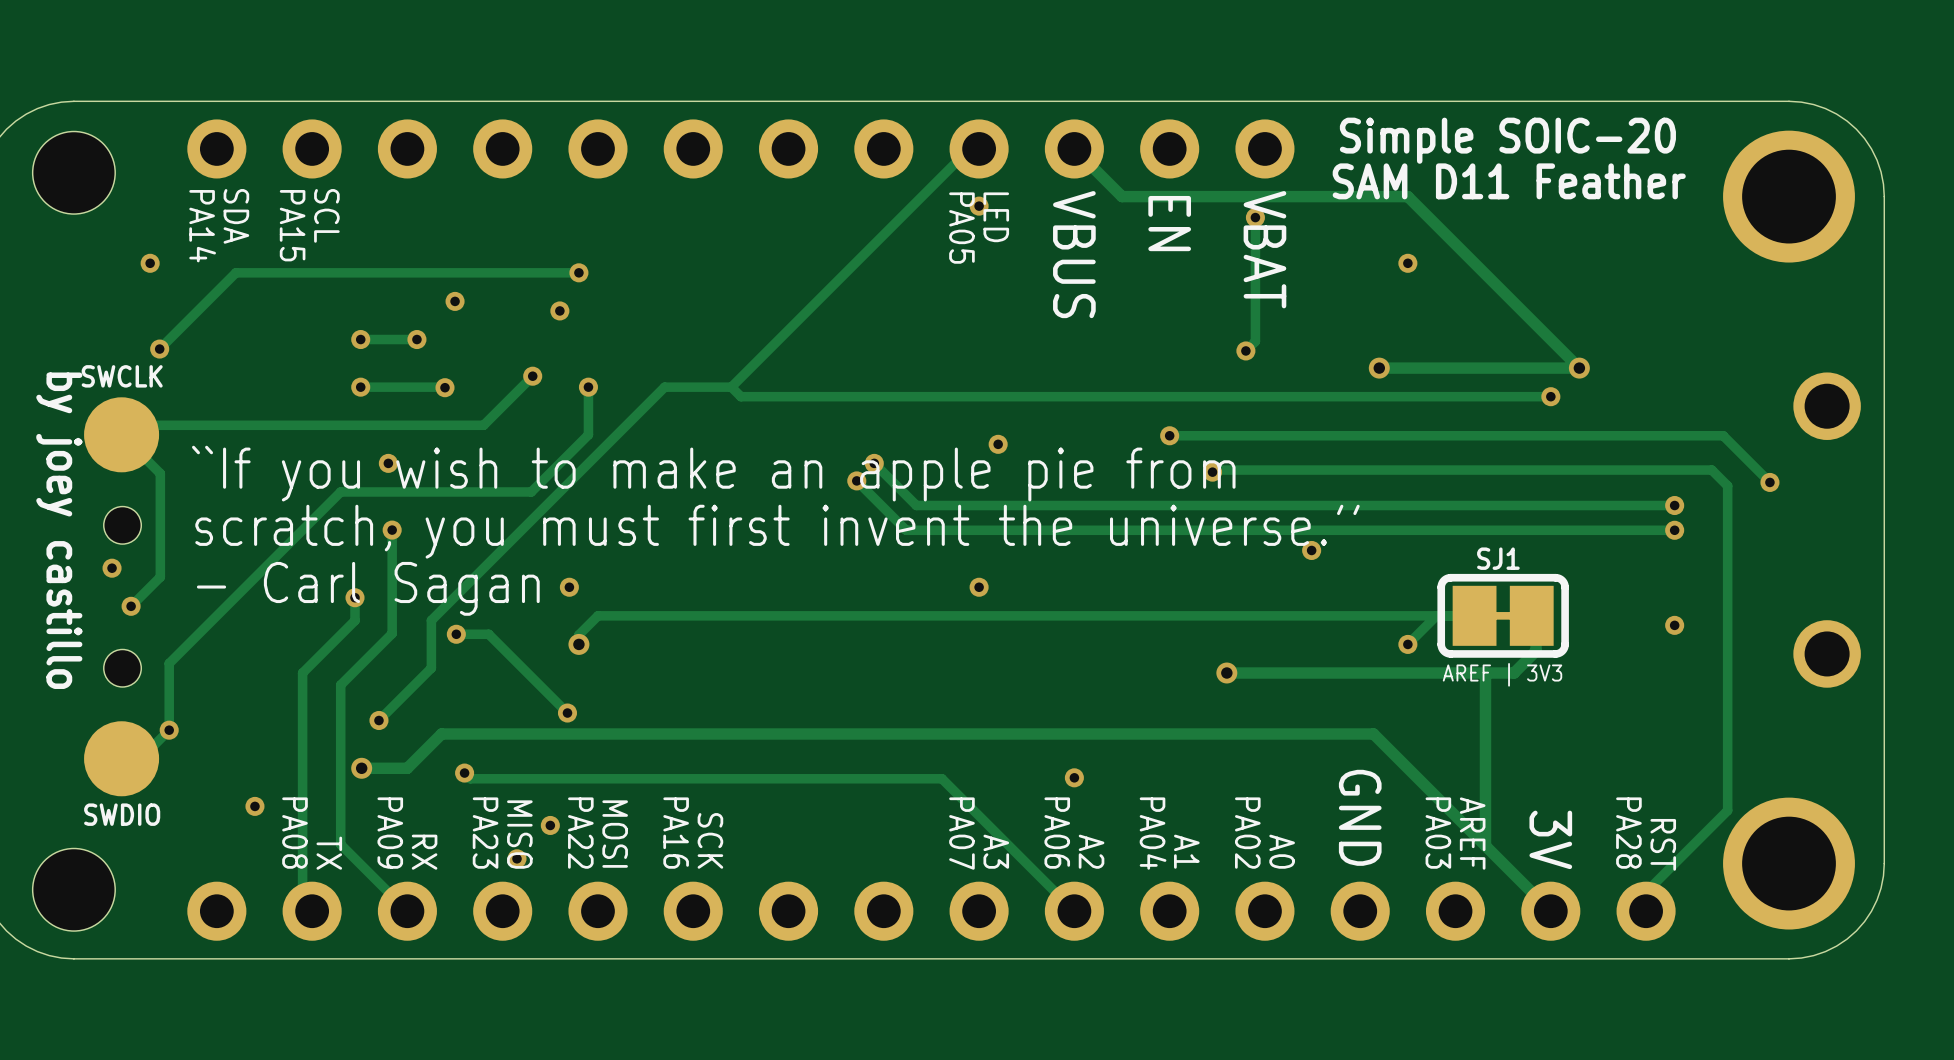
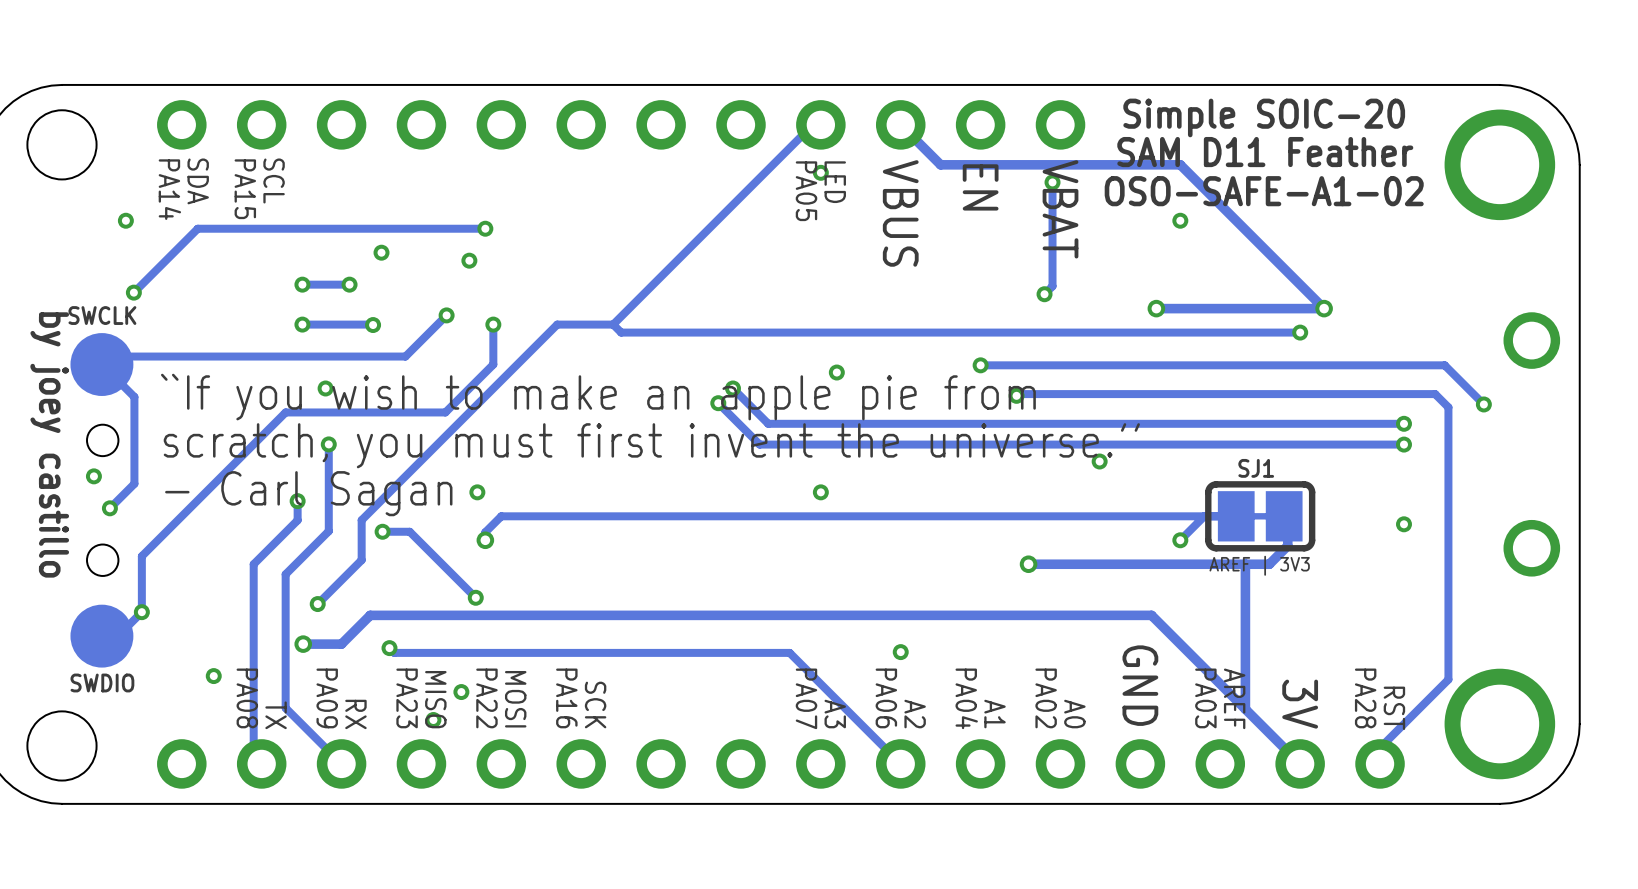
text: none -> OSO-SAFE-A1-02 (1264, 191)

